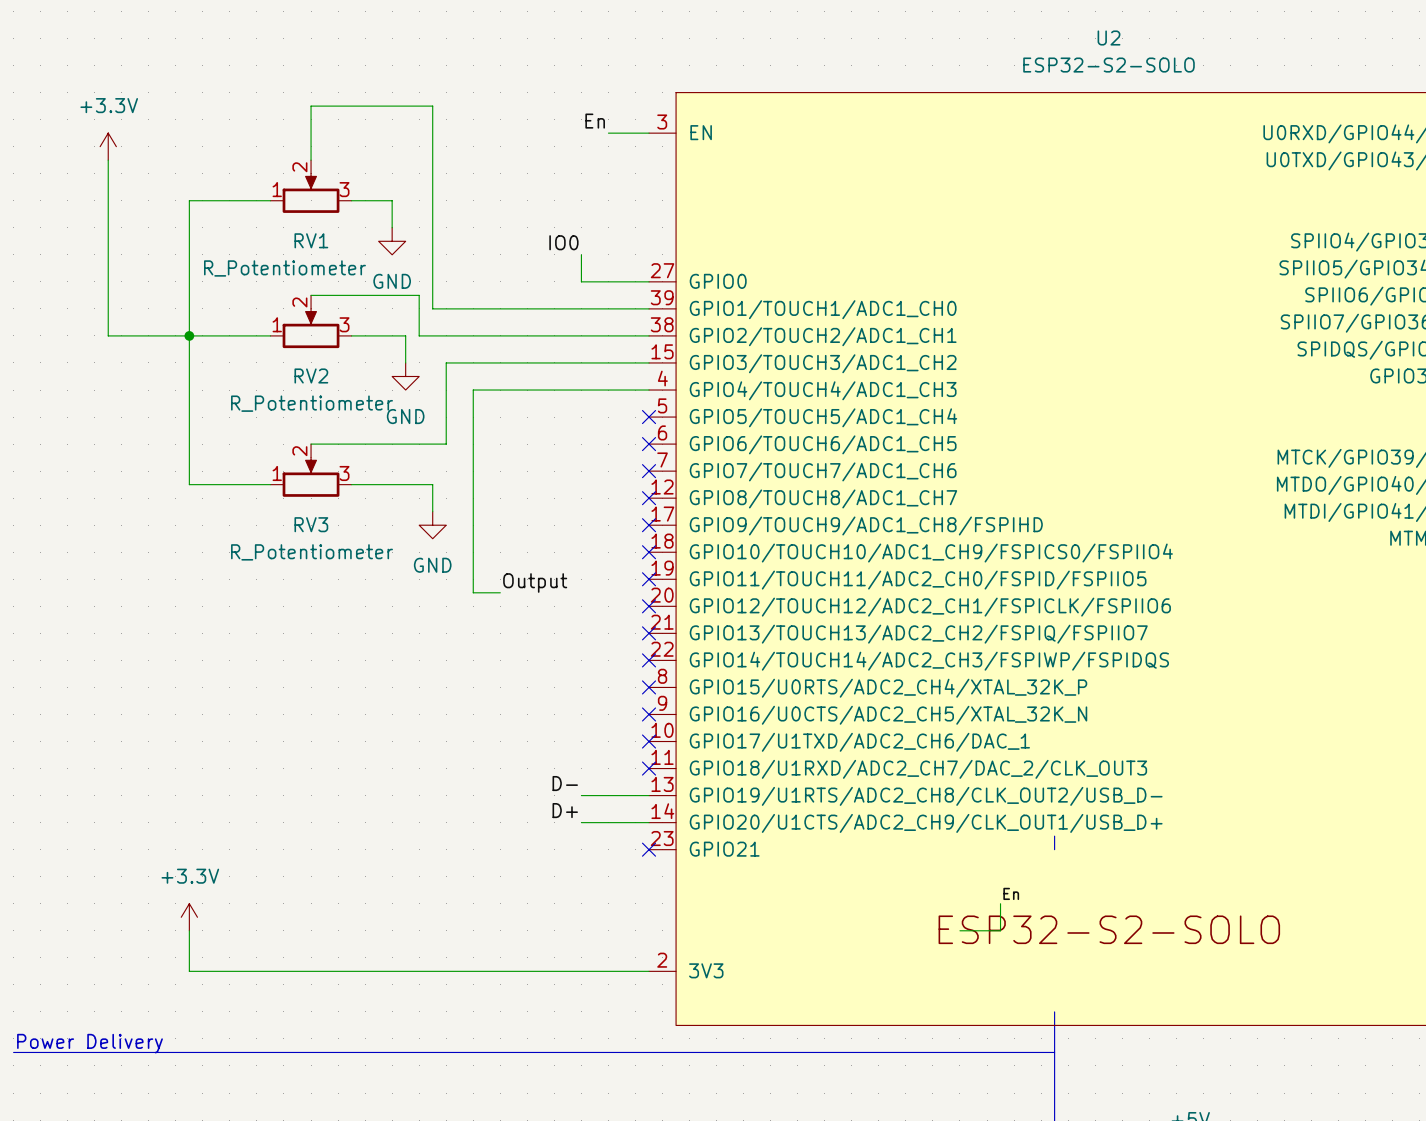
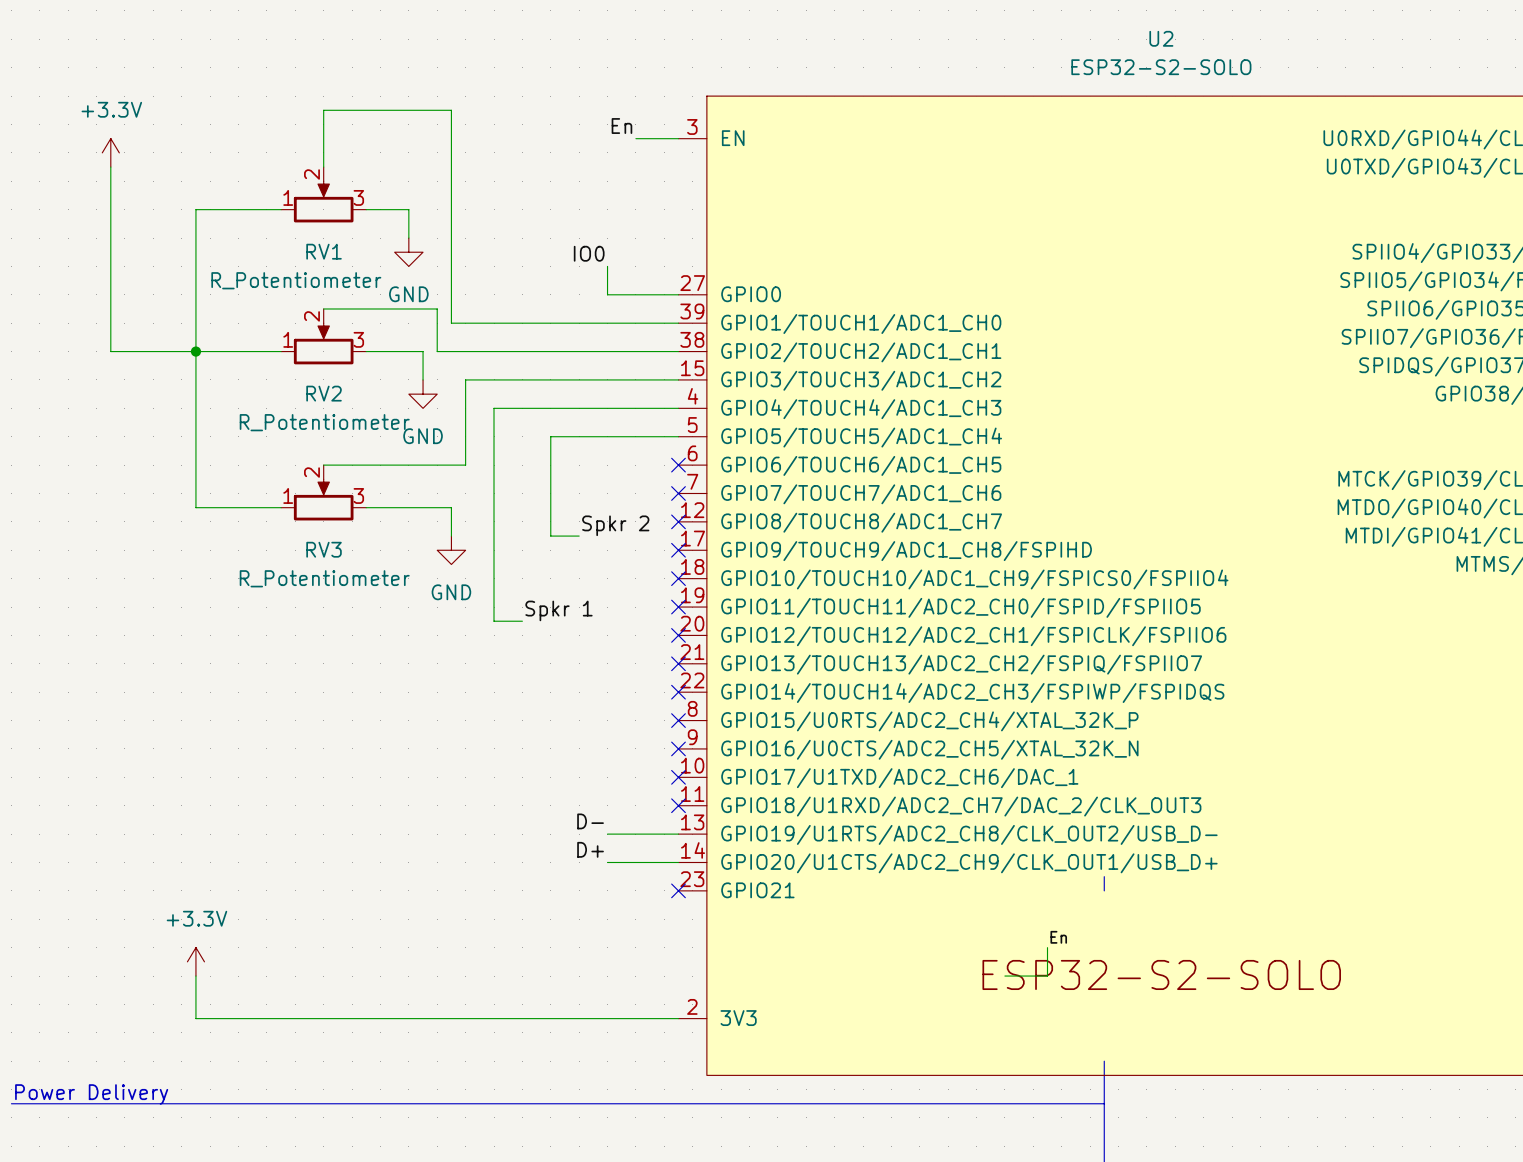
wire: none -> (678, 436) (550, 436) (550, 536) (579, 536)
no-connect mark: (649, 417) -> none
label: none -> Spkr 2 (615, 525)
label: Output (535, 582) -> Spkr 1 (558, 610)

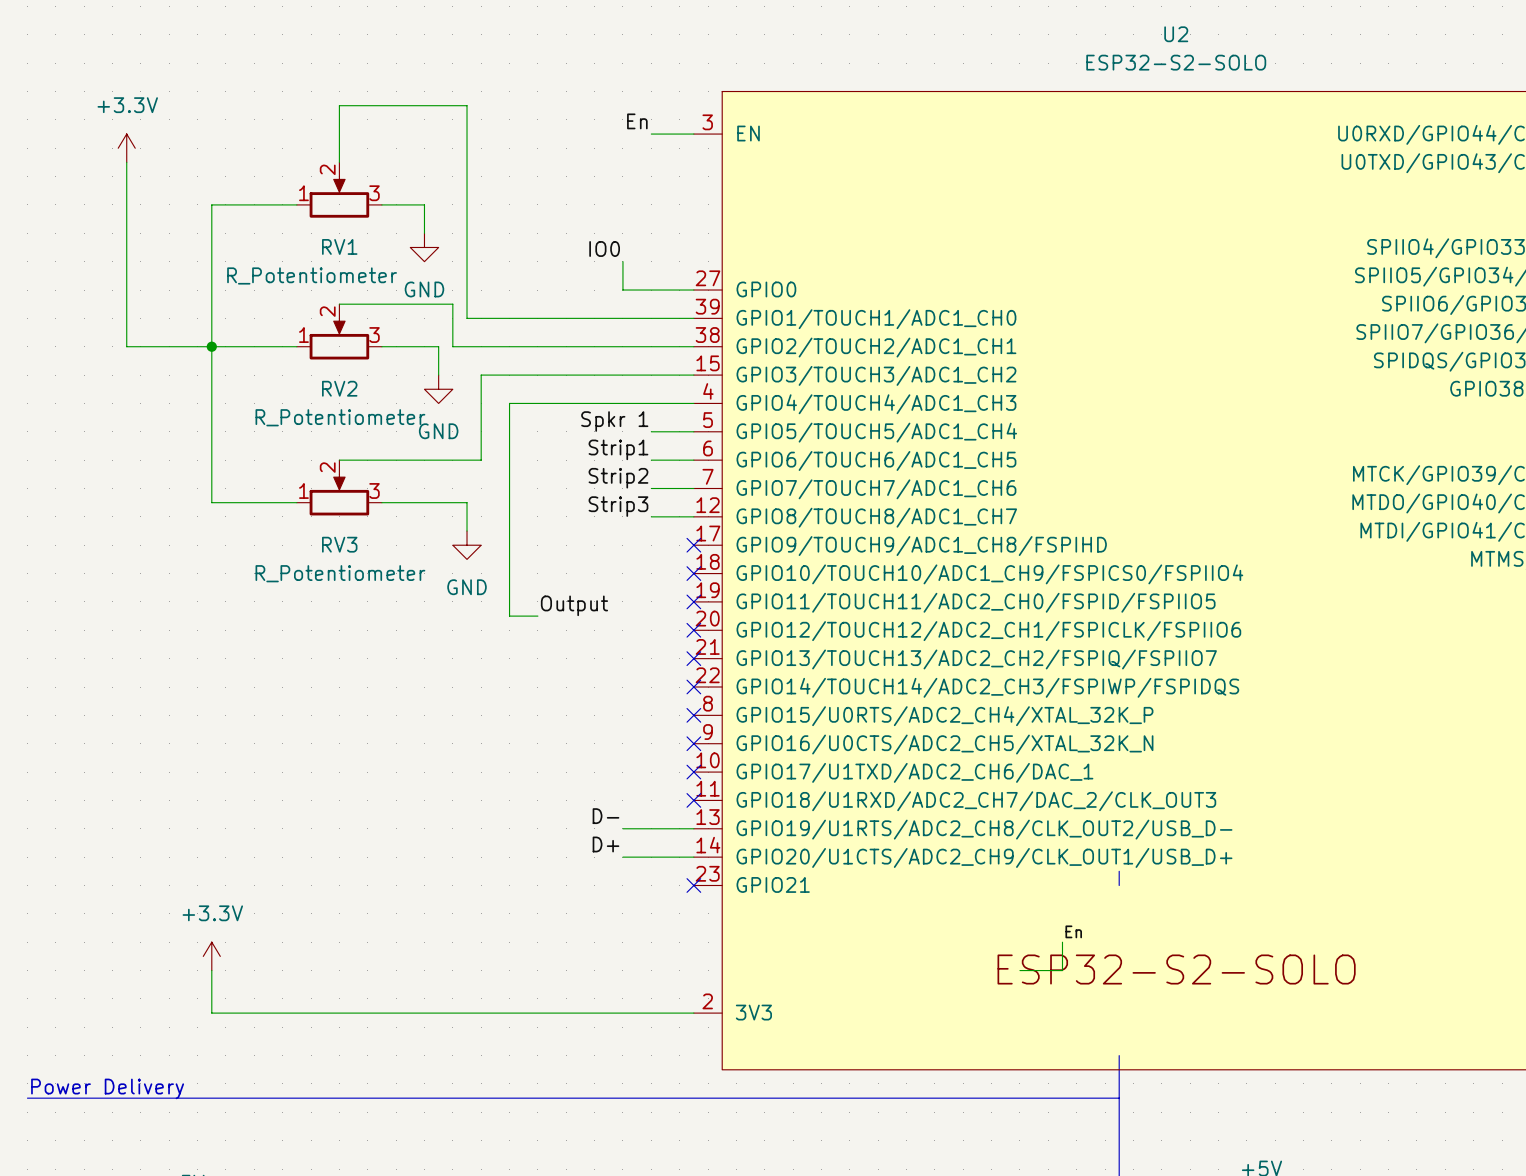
label: none -> Spkr 1 (614, 421)
wire: (635, 436) (550, 436) (550, 536) (579, 536) -> none
label: none -> Strip1 (618, 449)
wire: none -> (651, 460) (693, 460)
no-connect mark: (678, 465) -> none
label: none -> Strip2 (618, 478)
wire: none -> (651, 488) (693, 488)
no-connect mark: (678, 493) -> none
label: none -> Strip3 (618, 506)
wire: none -> (651, 516) (693, 516)
no-connect mark: (678, 521) -> none
label: Spkr 2 (615, 525) -> none
label: Spkr 1 (558, 610) -> Output (574, 605)

